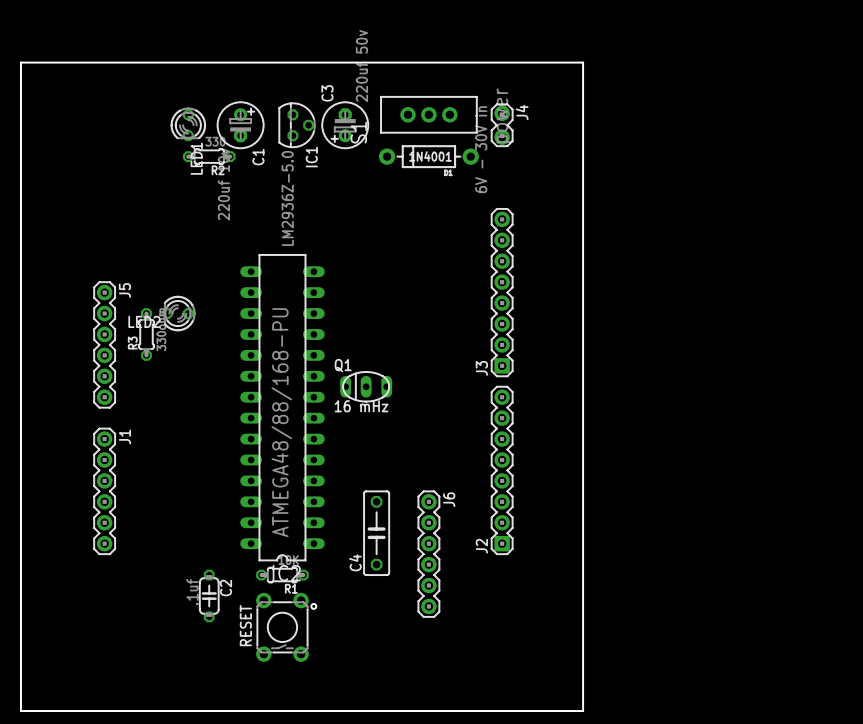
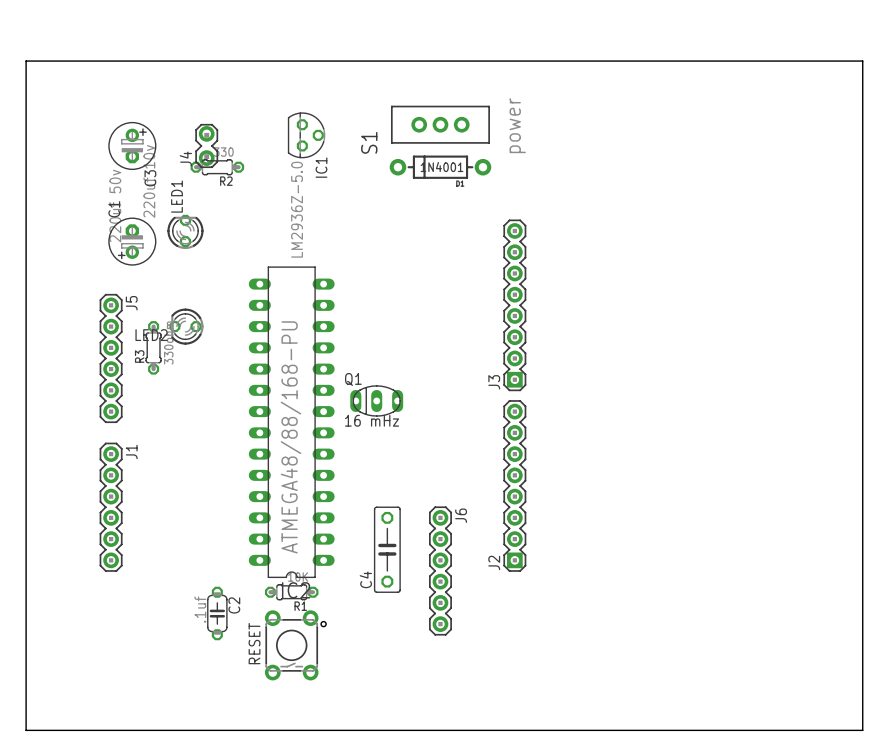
board edge: (20, 62) (583, 62) (583, 711) -> (26, 71) (26, 61) (862, 61) (862, 730) (597, 730)
J4 name position: J4 (522, 112) -> J4 (185, 158)
LED1 rotation: 0° (188, 124) -> 180° (185, 231)
LED1 position: (188, 124) -> (185, 231)
C1 rotation: 0° (240, 125) -> 180° (132, 241)
C1 position: (240, 125) -> (132, 241)
C3 rotation: 0° (345, 125) -> 180° (132, 145)
C3 position: (345, 125) -> (132, 145)
J4 position: (502, 125) -> (206, 145)
J4 value: 6V - 30V in (481, 149) -> none

